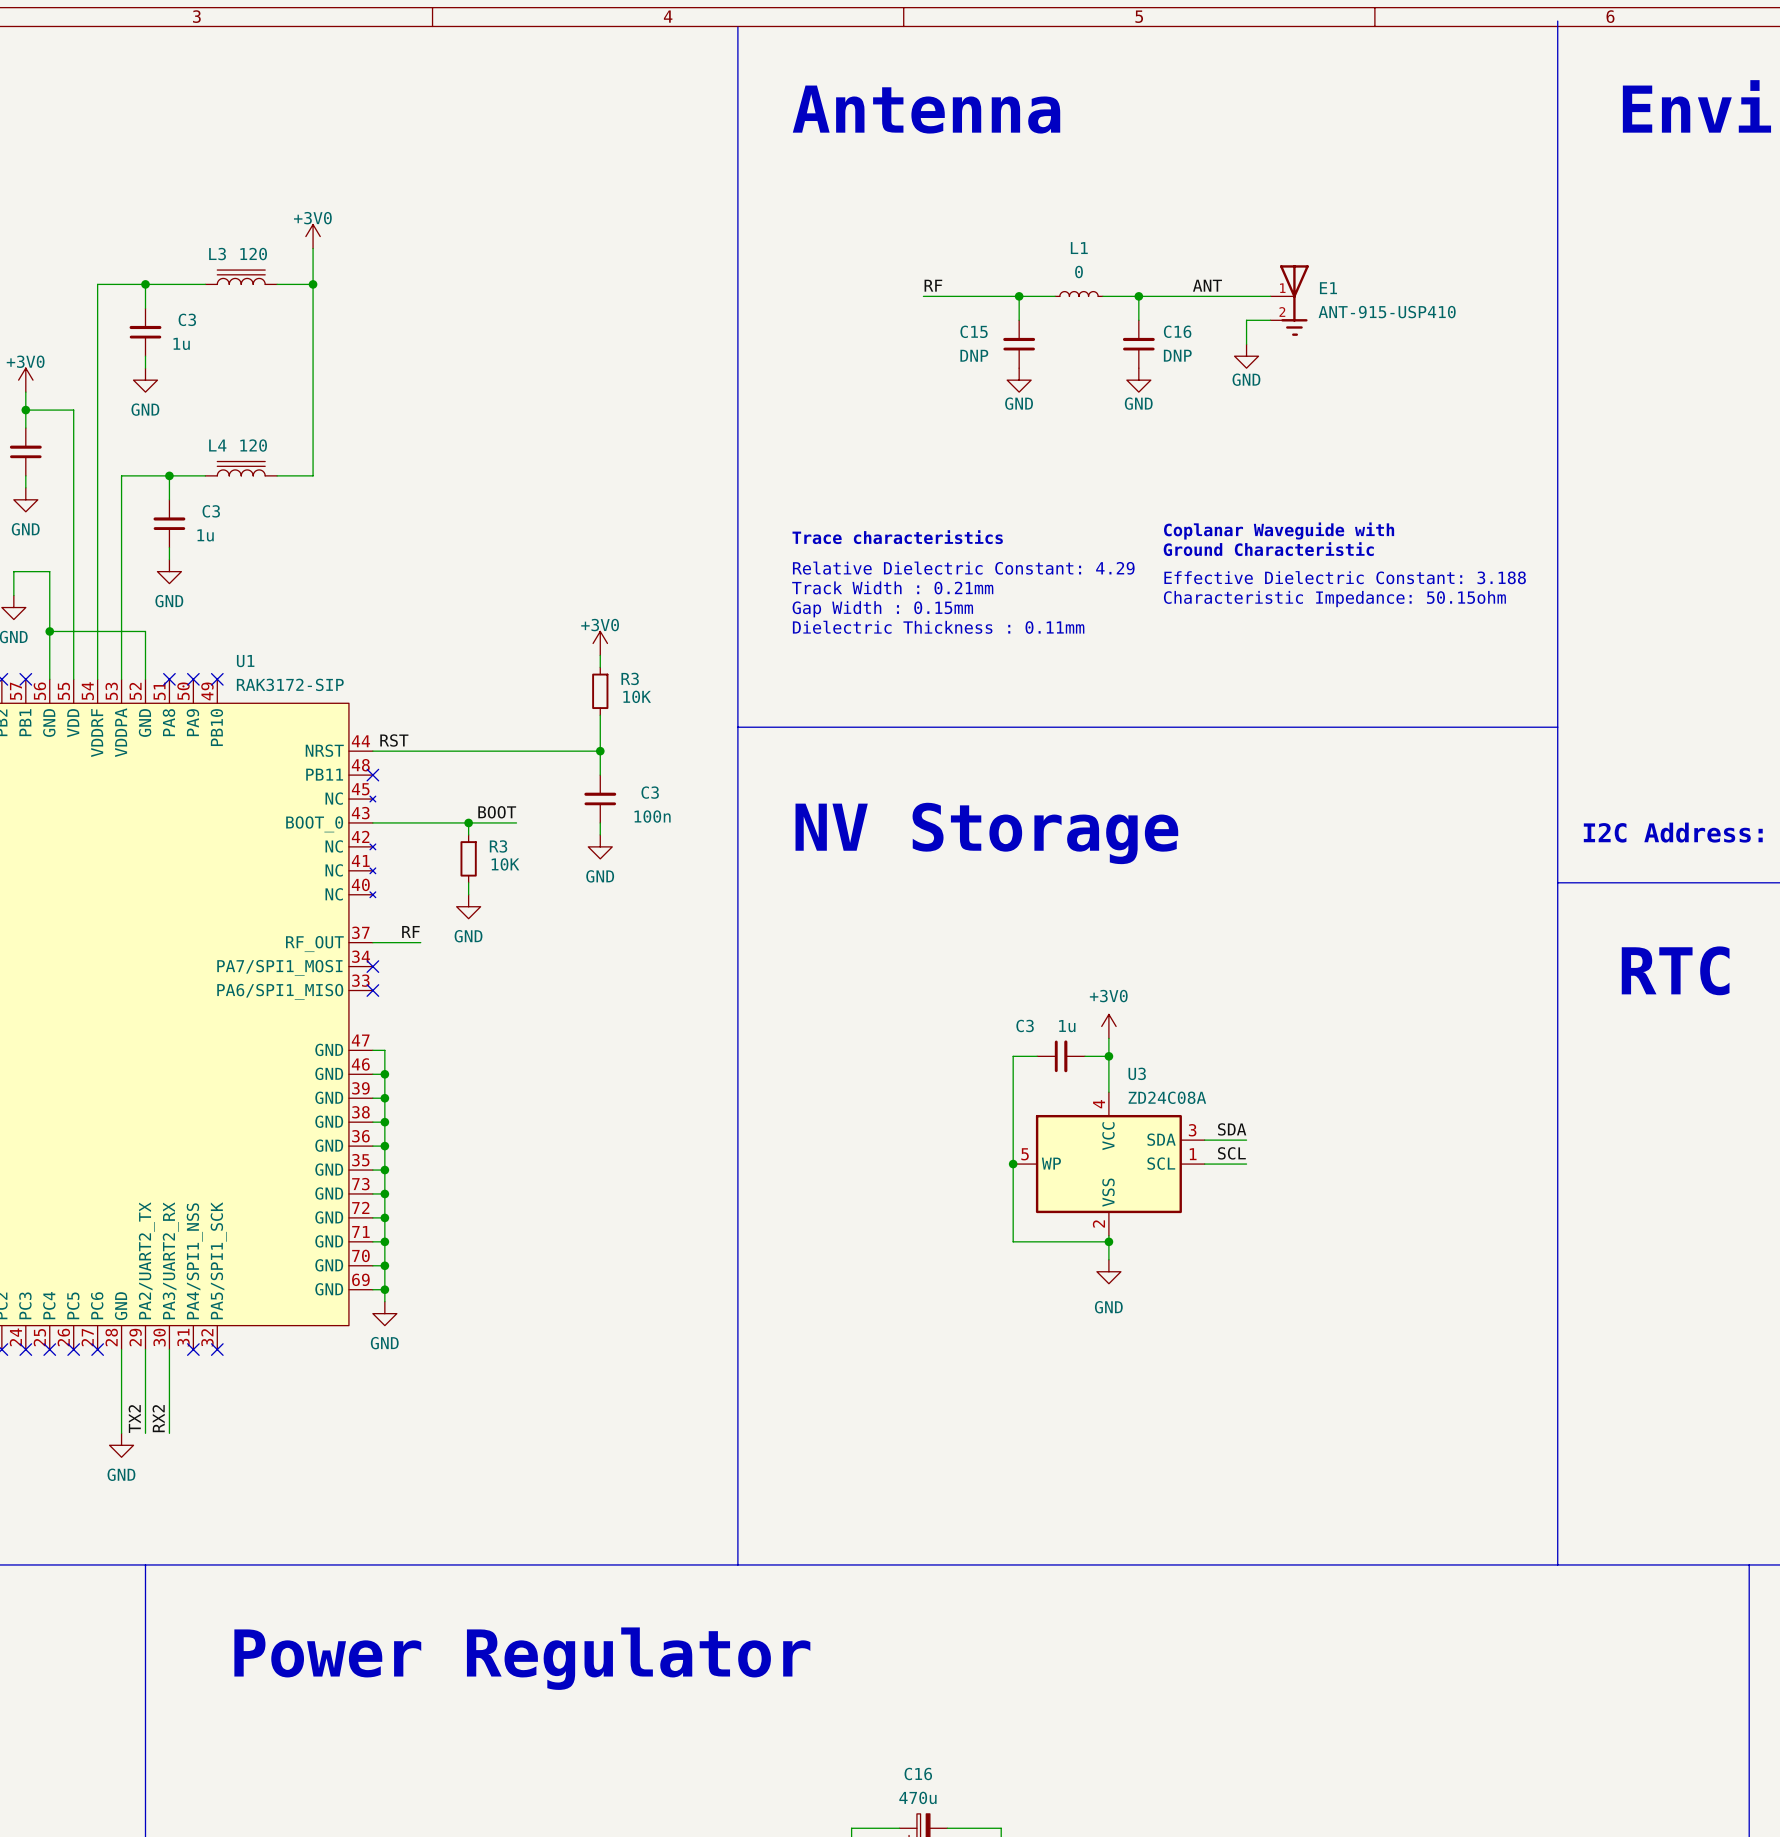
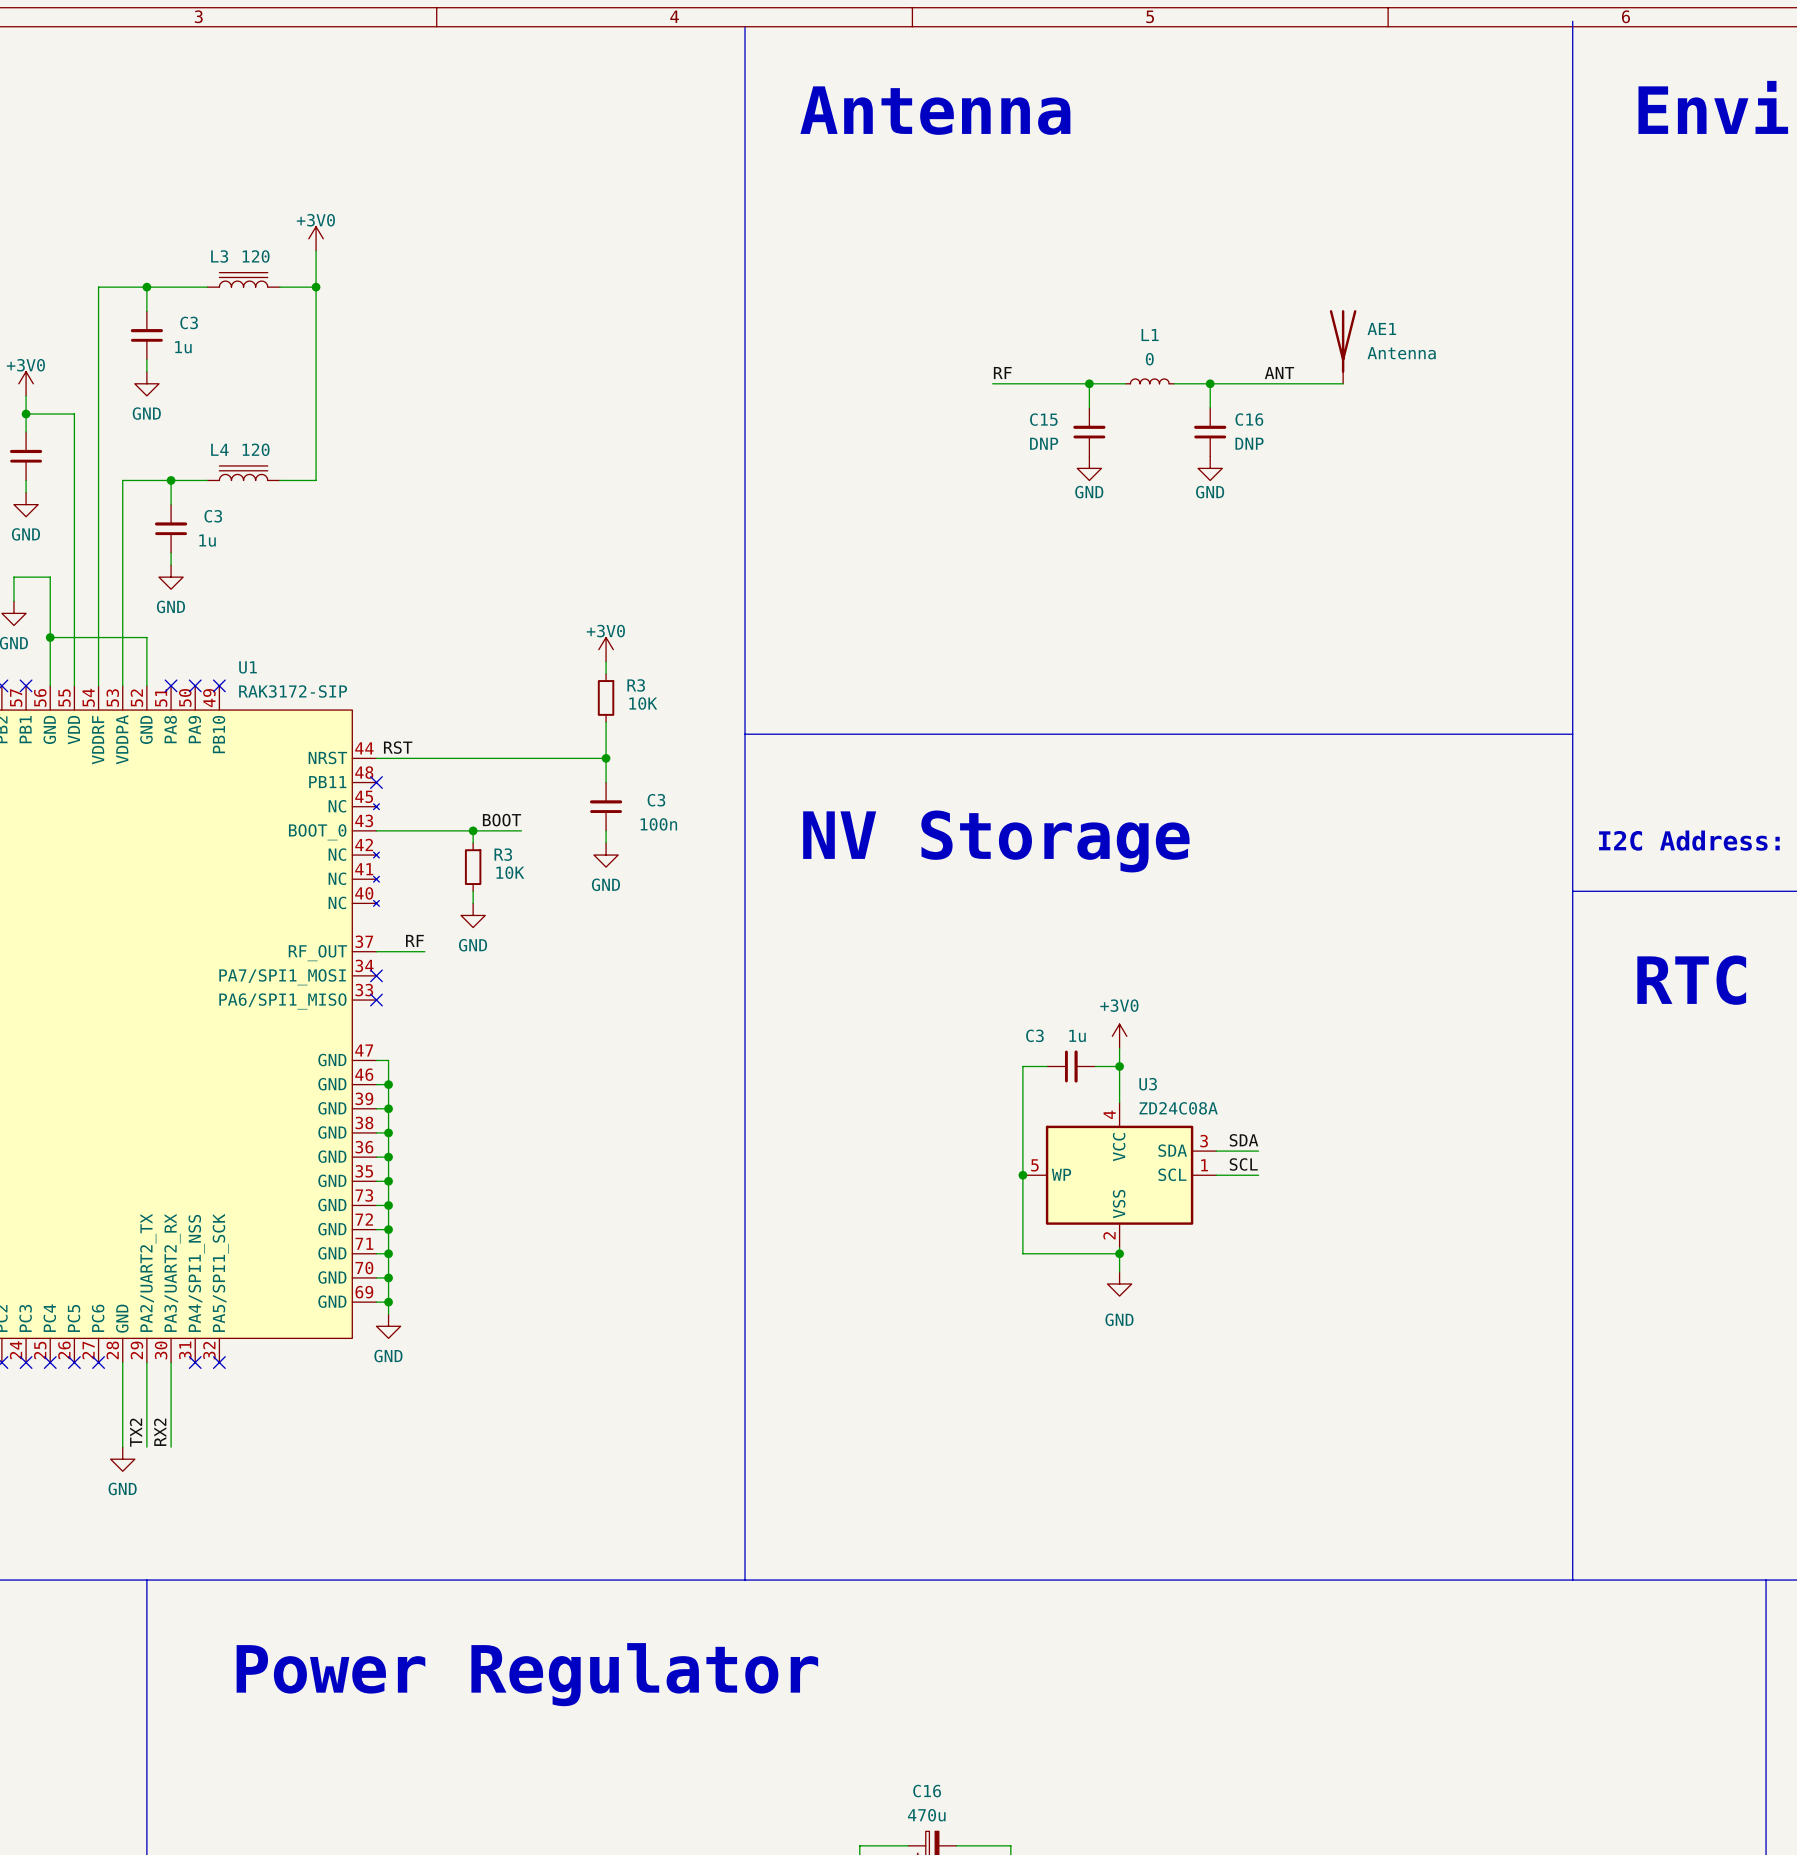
label position: RF (933, 285) -> RF (1002, 373)
label position: ANT (1207, 285) -> ANT (1279, 373)
L1 position: (1079, 293) -> (1149, 381)
wire: (923, 296) (1055, 296) -> (992, 383) (1125, 383)
wire: (1019, 296) (1019, 320) -> (1089, 383) (1089, 407)
junction: (1019, 296) -> none
wire: (1102, 296) (1270, 296) -> (1173, 383) (1343, 383)
wire: (1138, 296) (1138, 320) -> (1210, 383) (1210, 407)
junction: (1138, 296) -> none
E1: ANT-915-USP410 (1289, 300) -> none
wire: (1270, 320) (1246, 320) (1246, 344) -> none
AE1: none -> Antenna (1343, 346)
C15 position: (1019, 344) -> (1089, 432)
C16 position: (1138, 344) -> (1210, 432)
power symbol: GND (1246, 356) -> none
power symbol: GND (1019, 380) -> none
junction: none -> (1089, 383)
power symbol: GND (1138, 380) -> none
junction: none -> (1210, 383)
power symbol: none -> GND (1089, 468)
power symbol: none -> GND (1210, 468)
text: Coplanar Waveguide with (1279, 531) -> none
text: Trace characteristics (897, 537) -> none
text: Ground Characteristic (1268, 549) -> none
text: Relative Dielectric Constant: 4.29 (963, 568) -> none
text: Effective Dielectric Constant: 3.188 (1345, 577) -> none
text: Track Width : 0.21mm (892, 587) -> none
text: Characteristic Impedance: 50.15ohm (1334, 599) -> none
text: Gap Width : 0.15mm (882, 609) -> none
text: Dielectric Thickness : 0.11mm (938, 627) -> none

